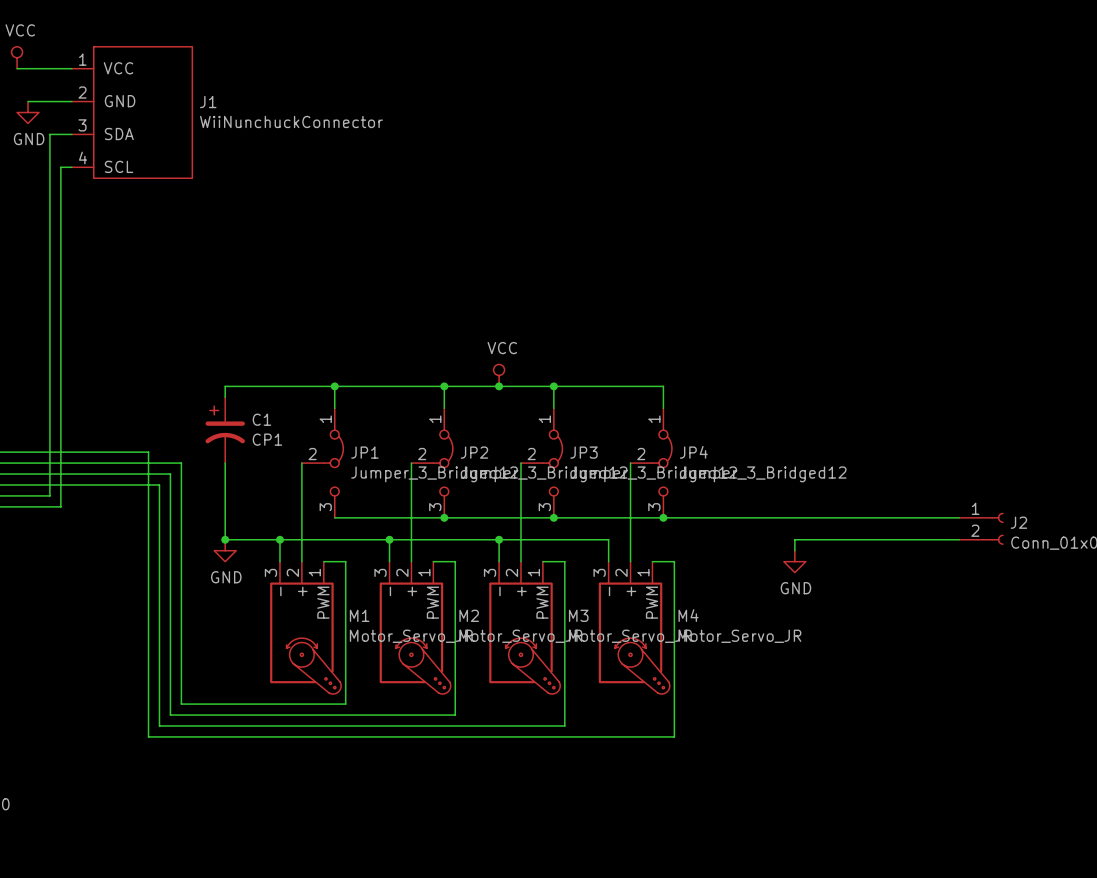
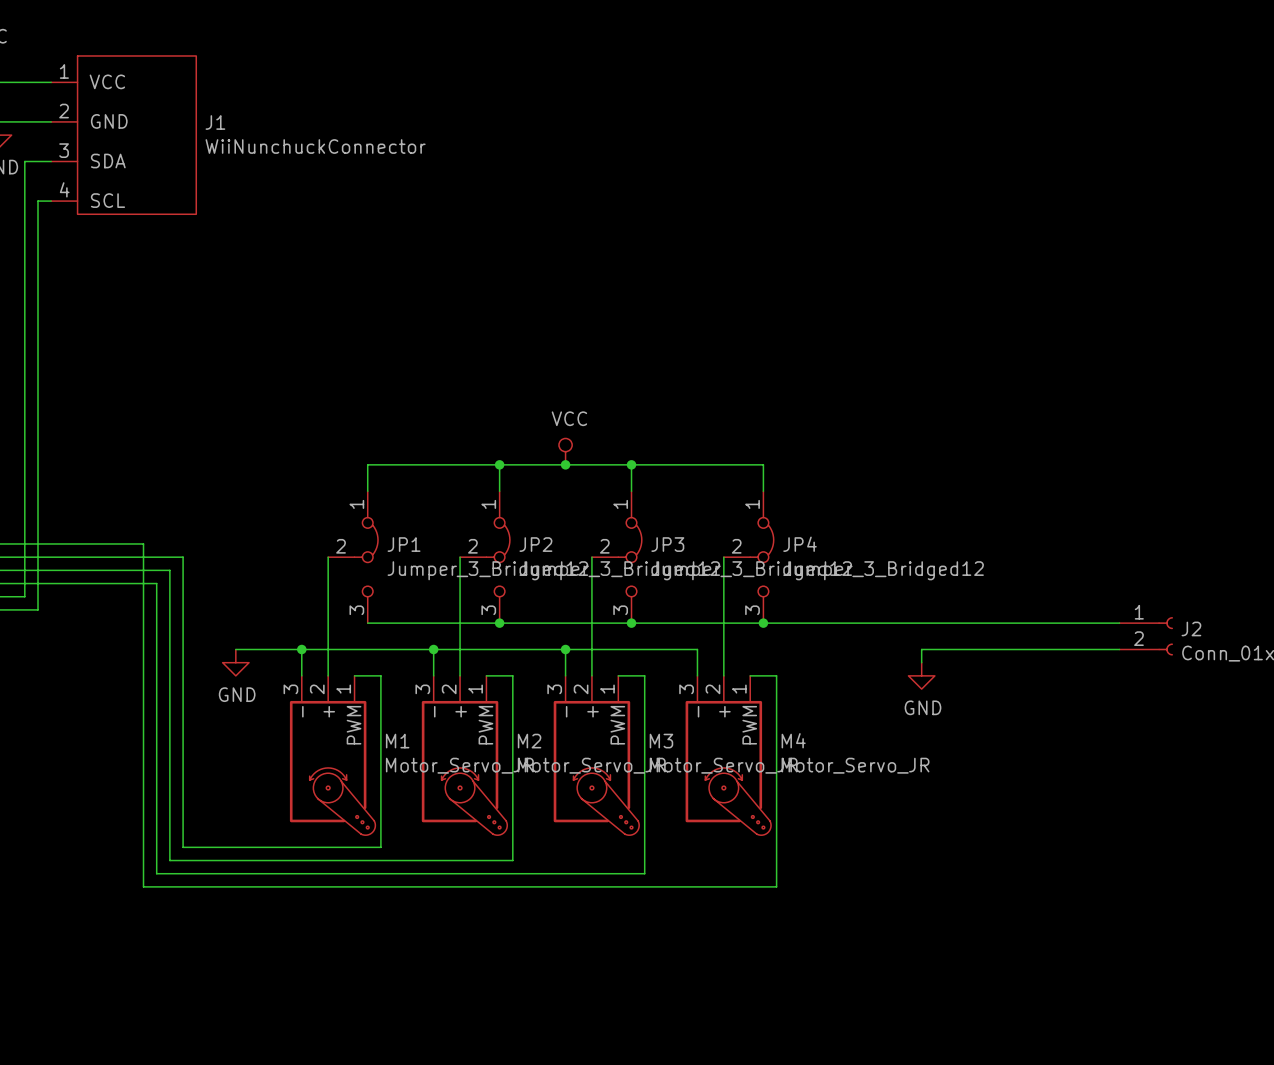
wire: (334, 386) (225, 386) (225, 397) -> none
junction: (334, 386) -> none
C1: CP1 (225, 430) -> none
wire: (225, 463) (225, 539) -> none
junction: (225, 539) -> none

